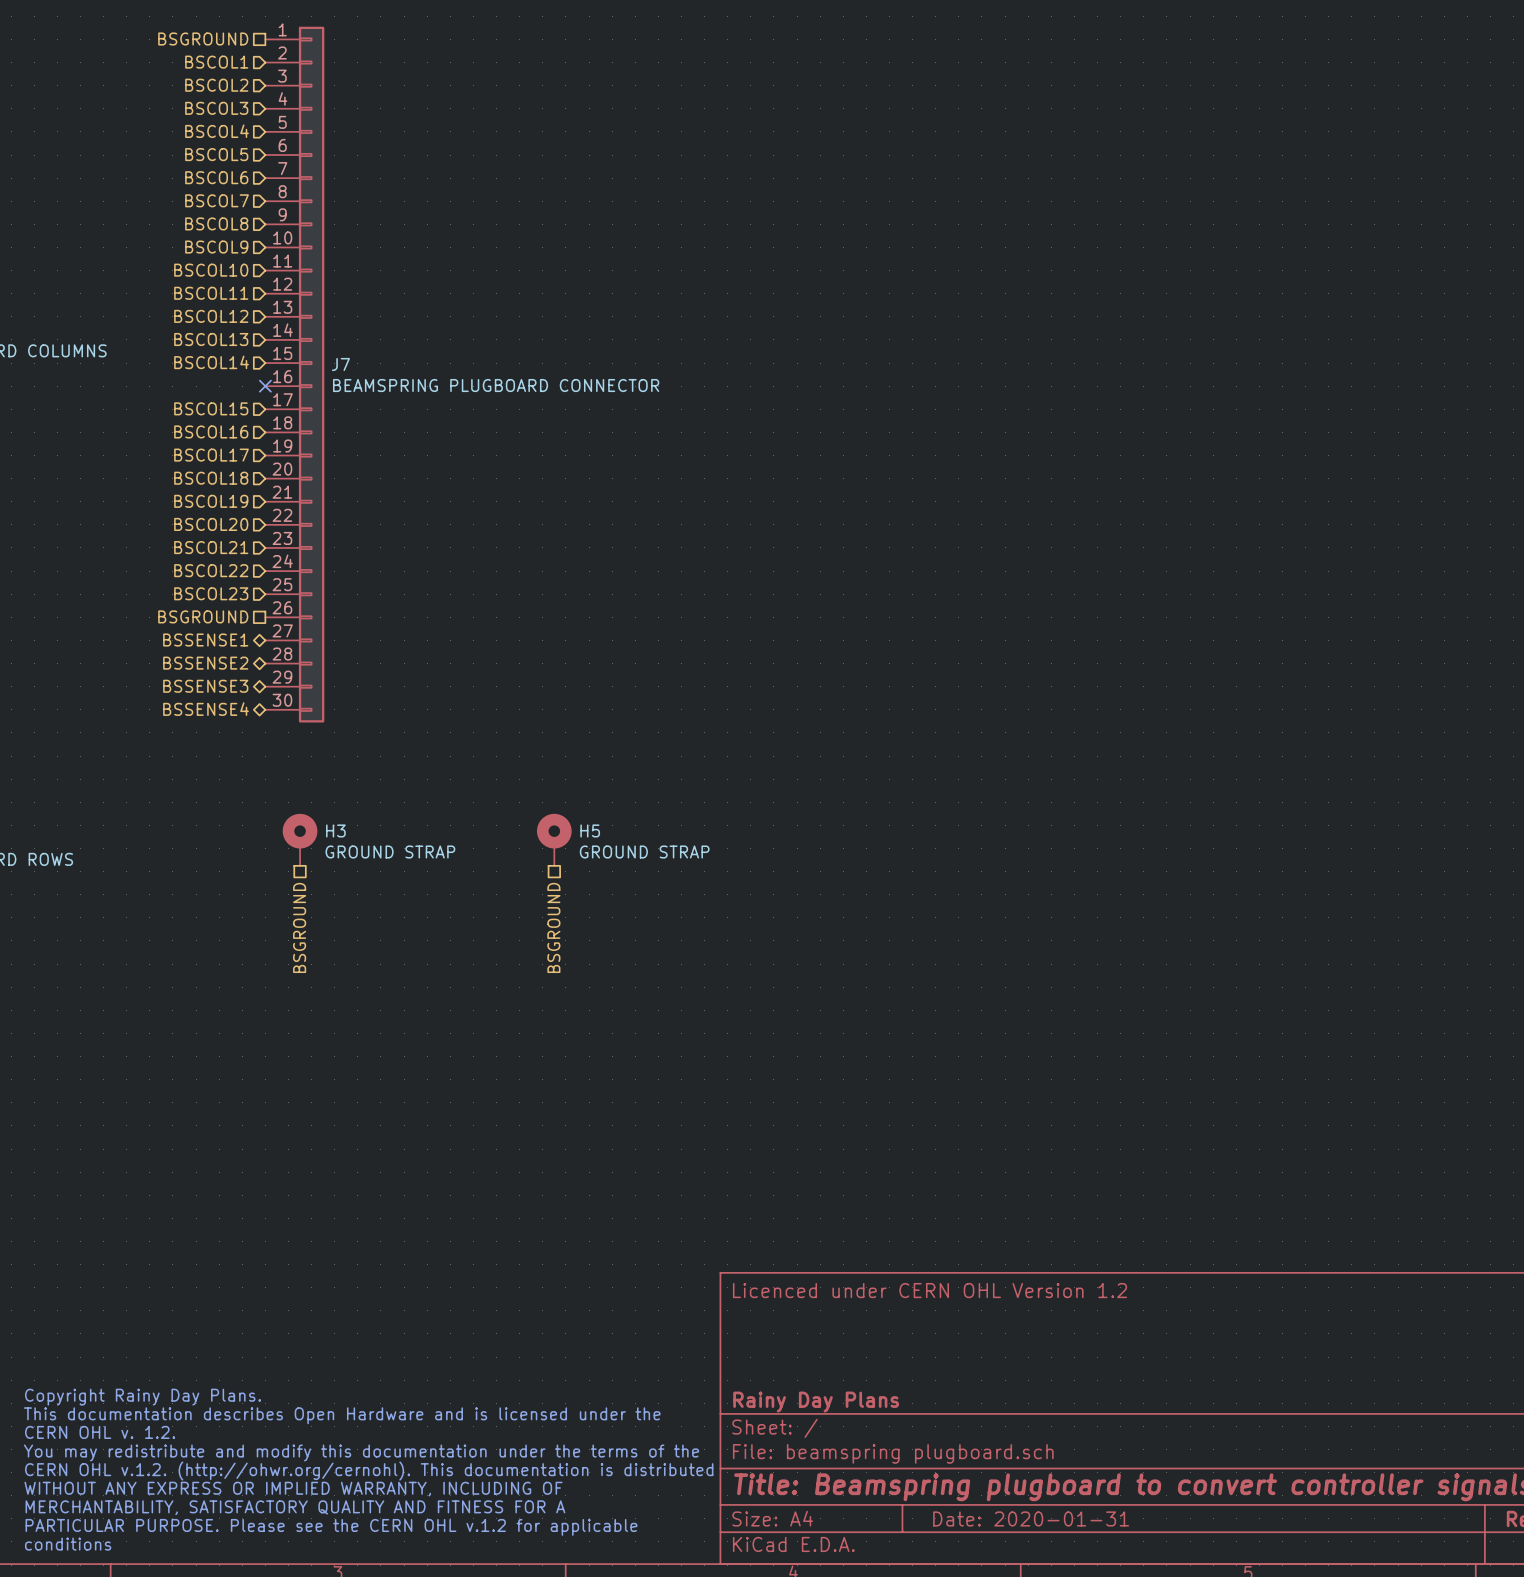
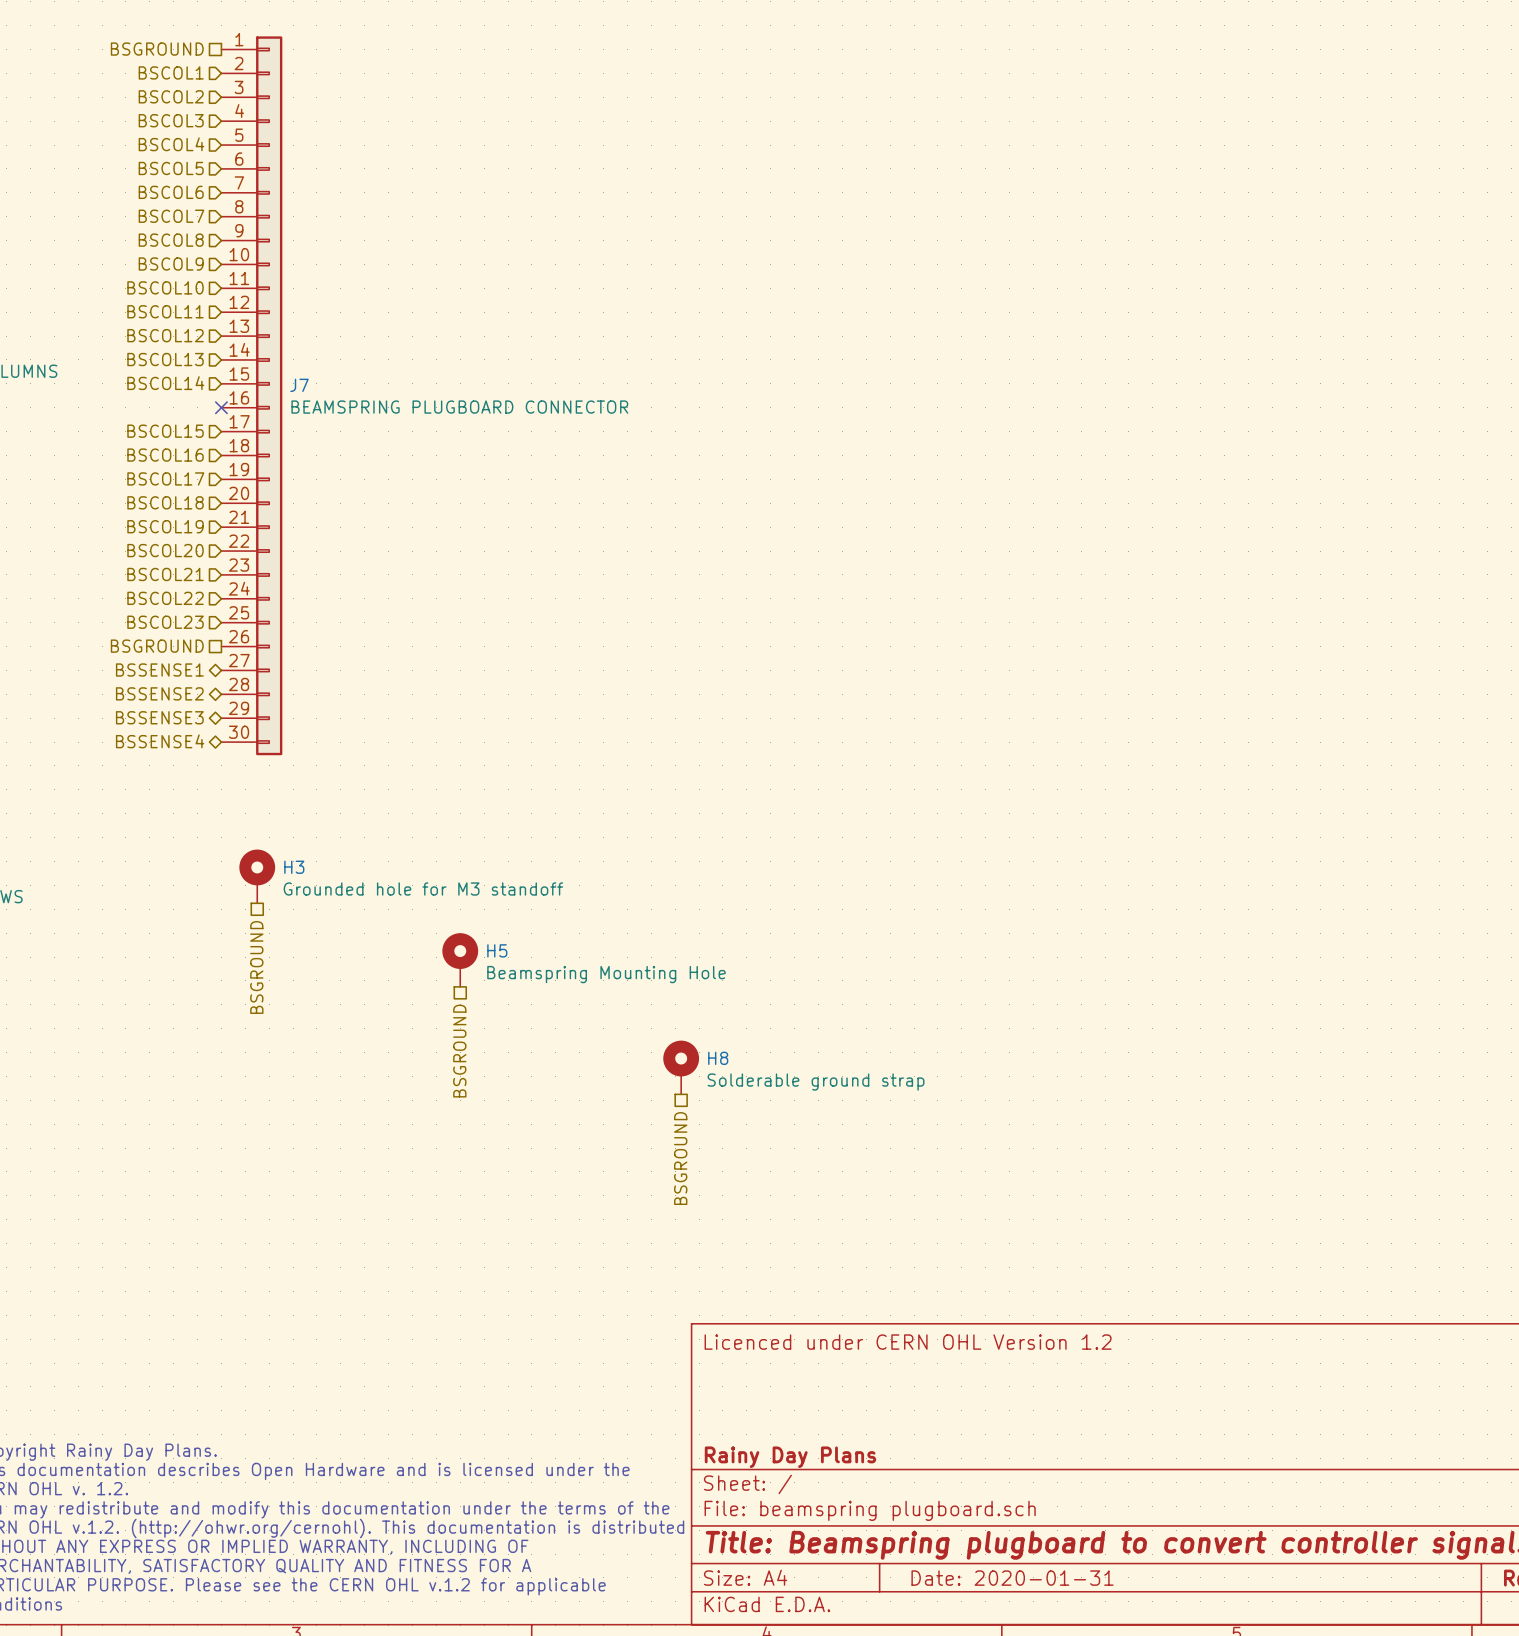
H5 position: (554, 839) -> (460, 960)
H3 value: GROUND STRAP (390, 852) -> Grounded hole for M3 standoff (423, 889)
H5 value: GROUND STRAP (644, 852) -> Beamspring Mounting Hole (606, 974)
hierarchical label position: BSGROUND (553, 927) -> BSGROUND (459, 1051)
H8: none -> Solderable ground strap (681, 1067)
hierarchical label: none -> BSGROUND (680, 1158)

